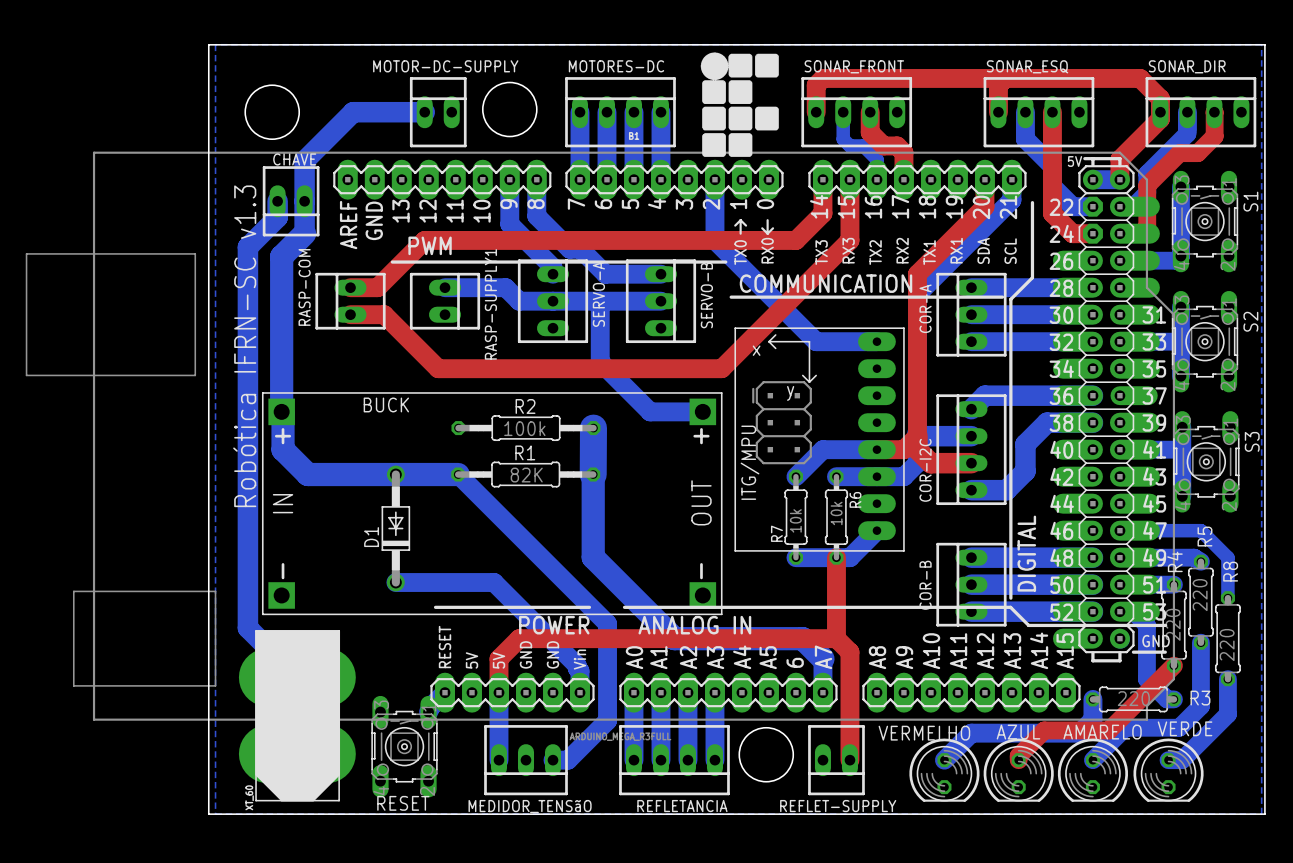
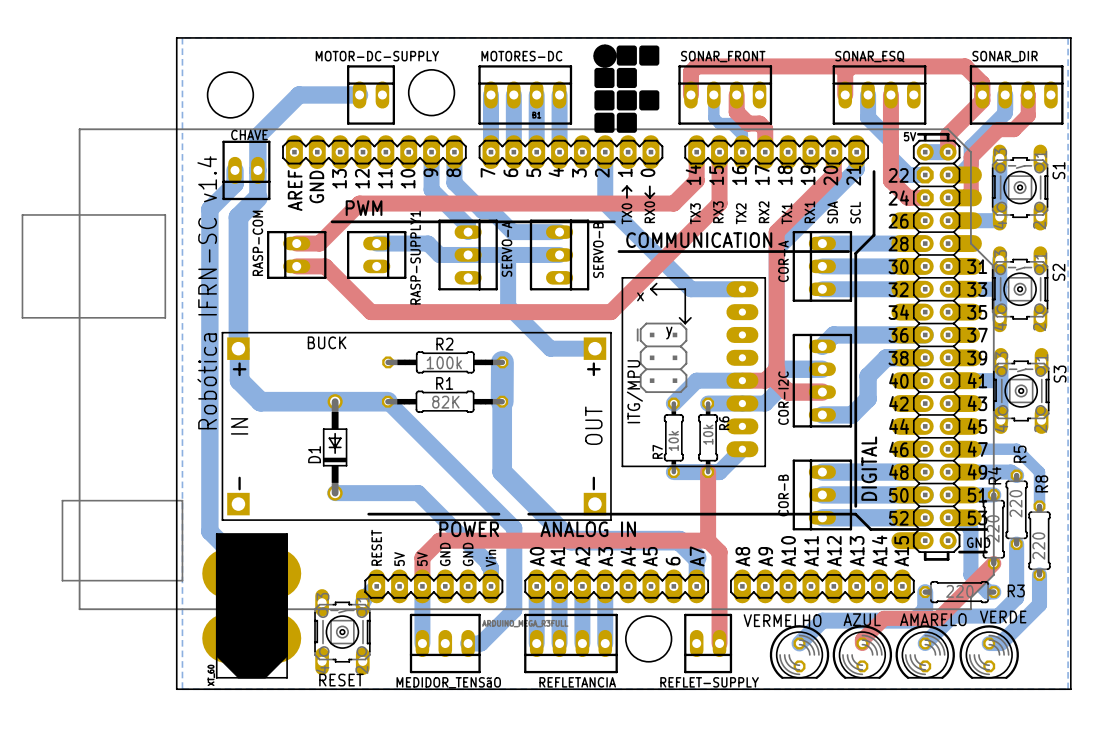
text: Robótica IFRN-SC v1.3 (244, 346) -> Robótica IFRN-SC v1.4 (207, 292)

